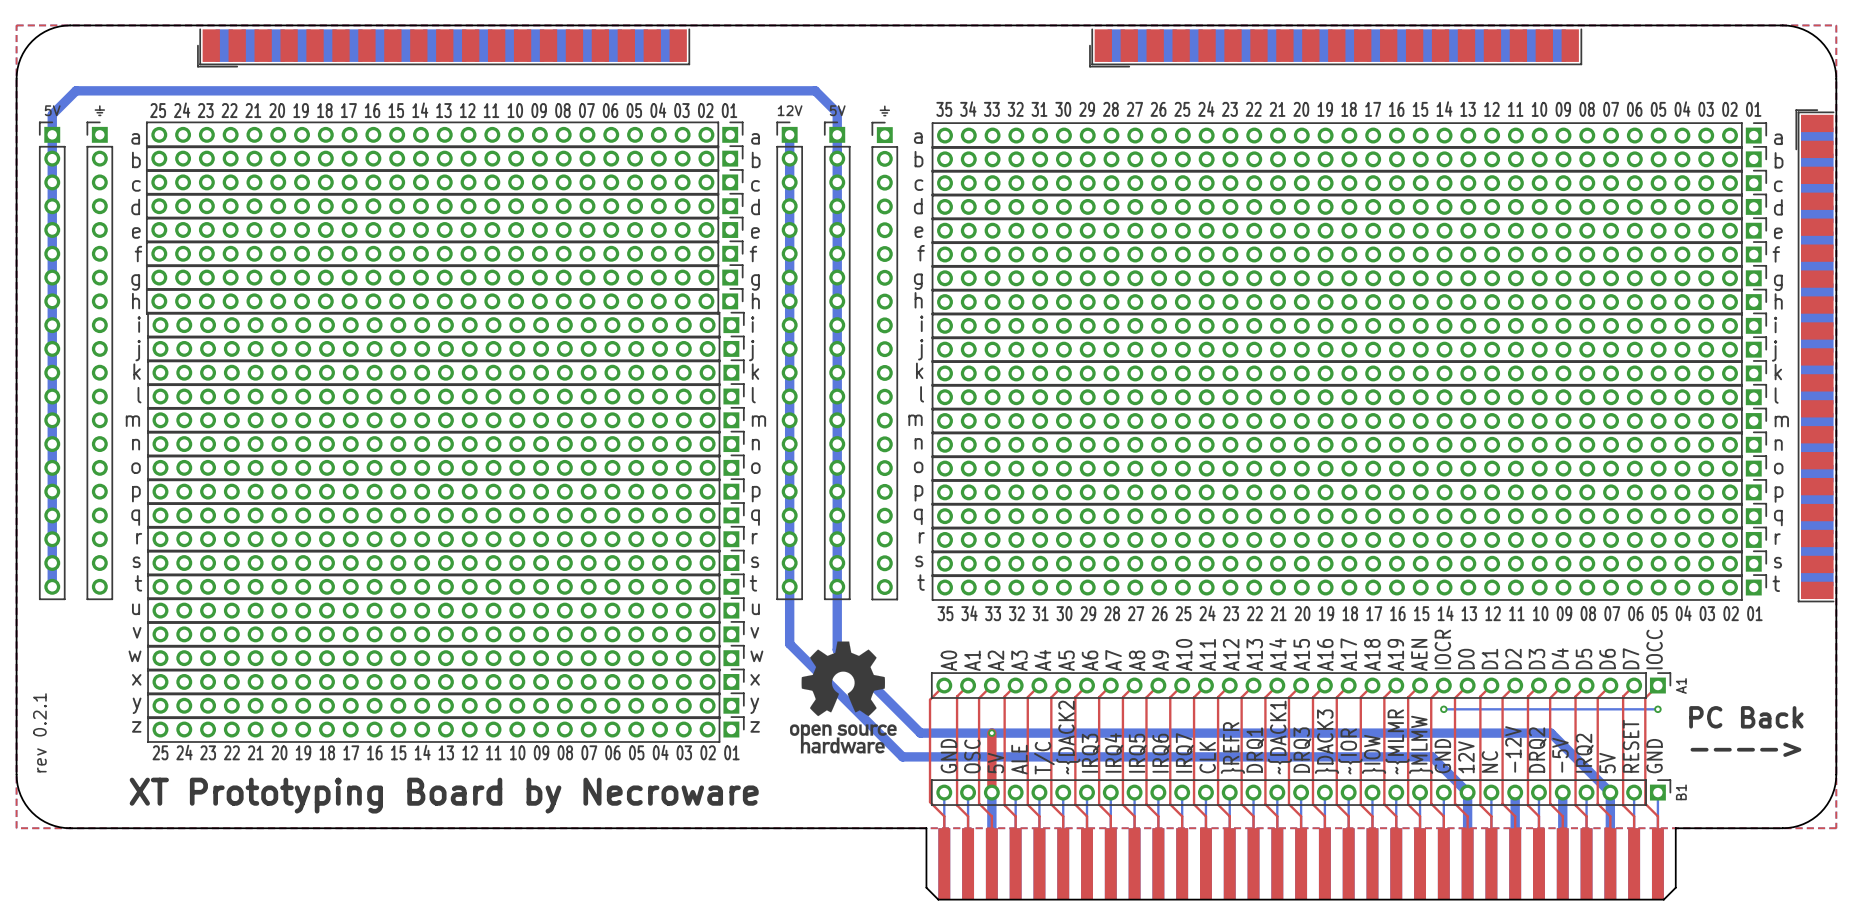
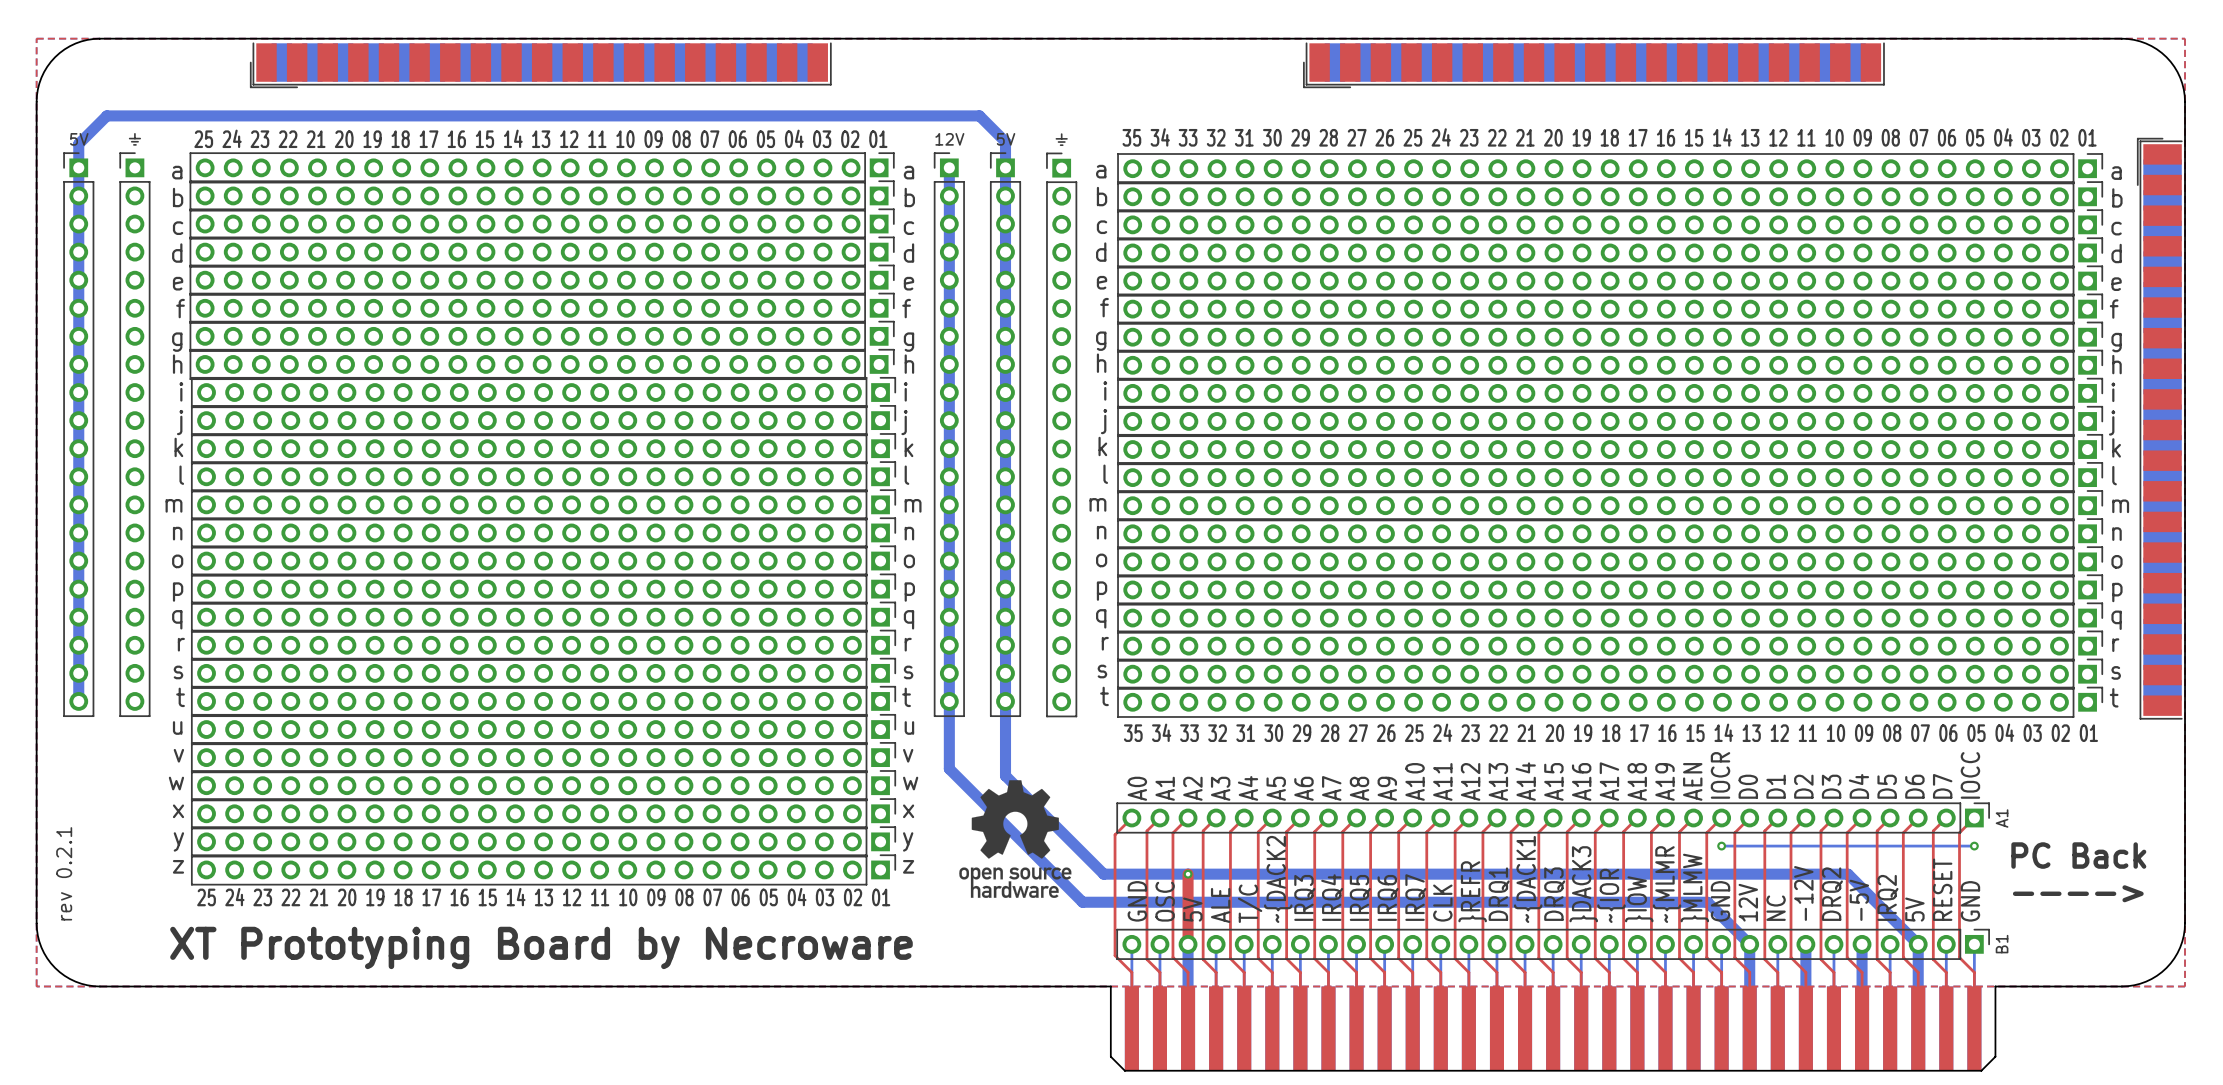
drawing shape: [789, 641, 897, 754] -> [959, 780, 1072, 898]

